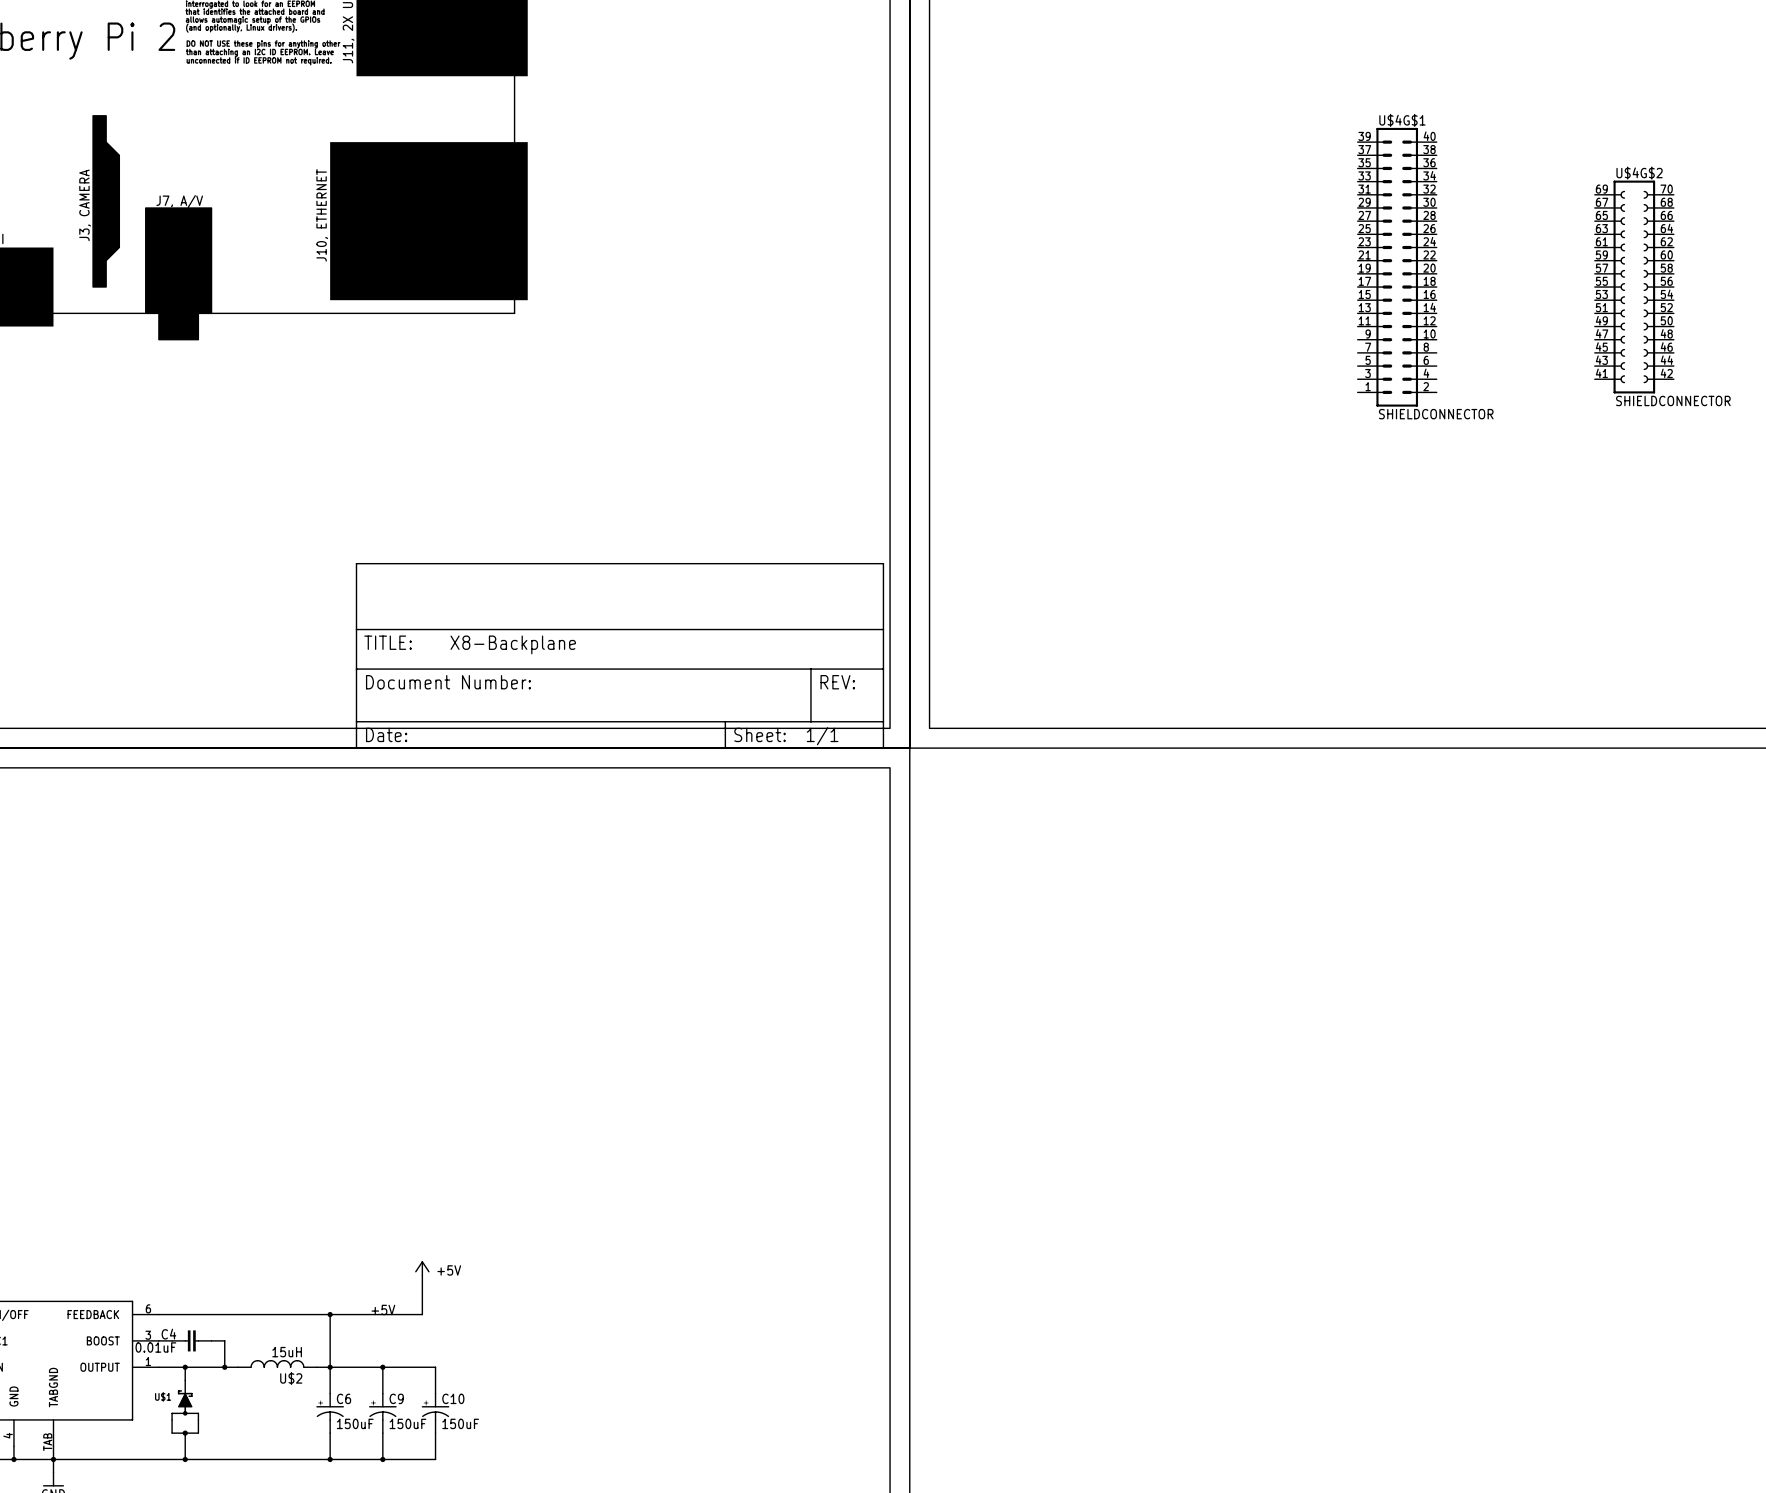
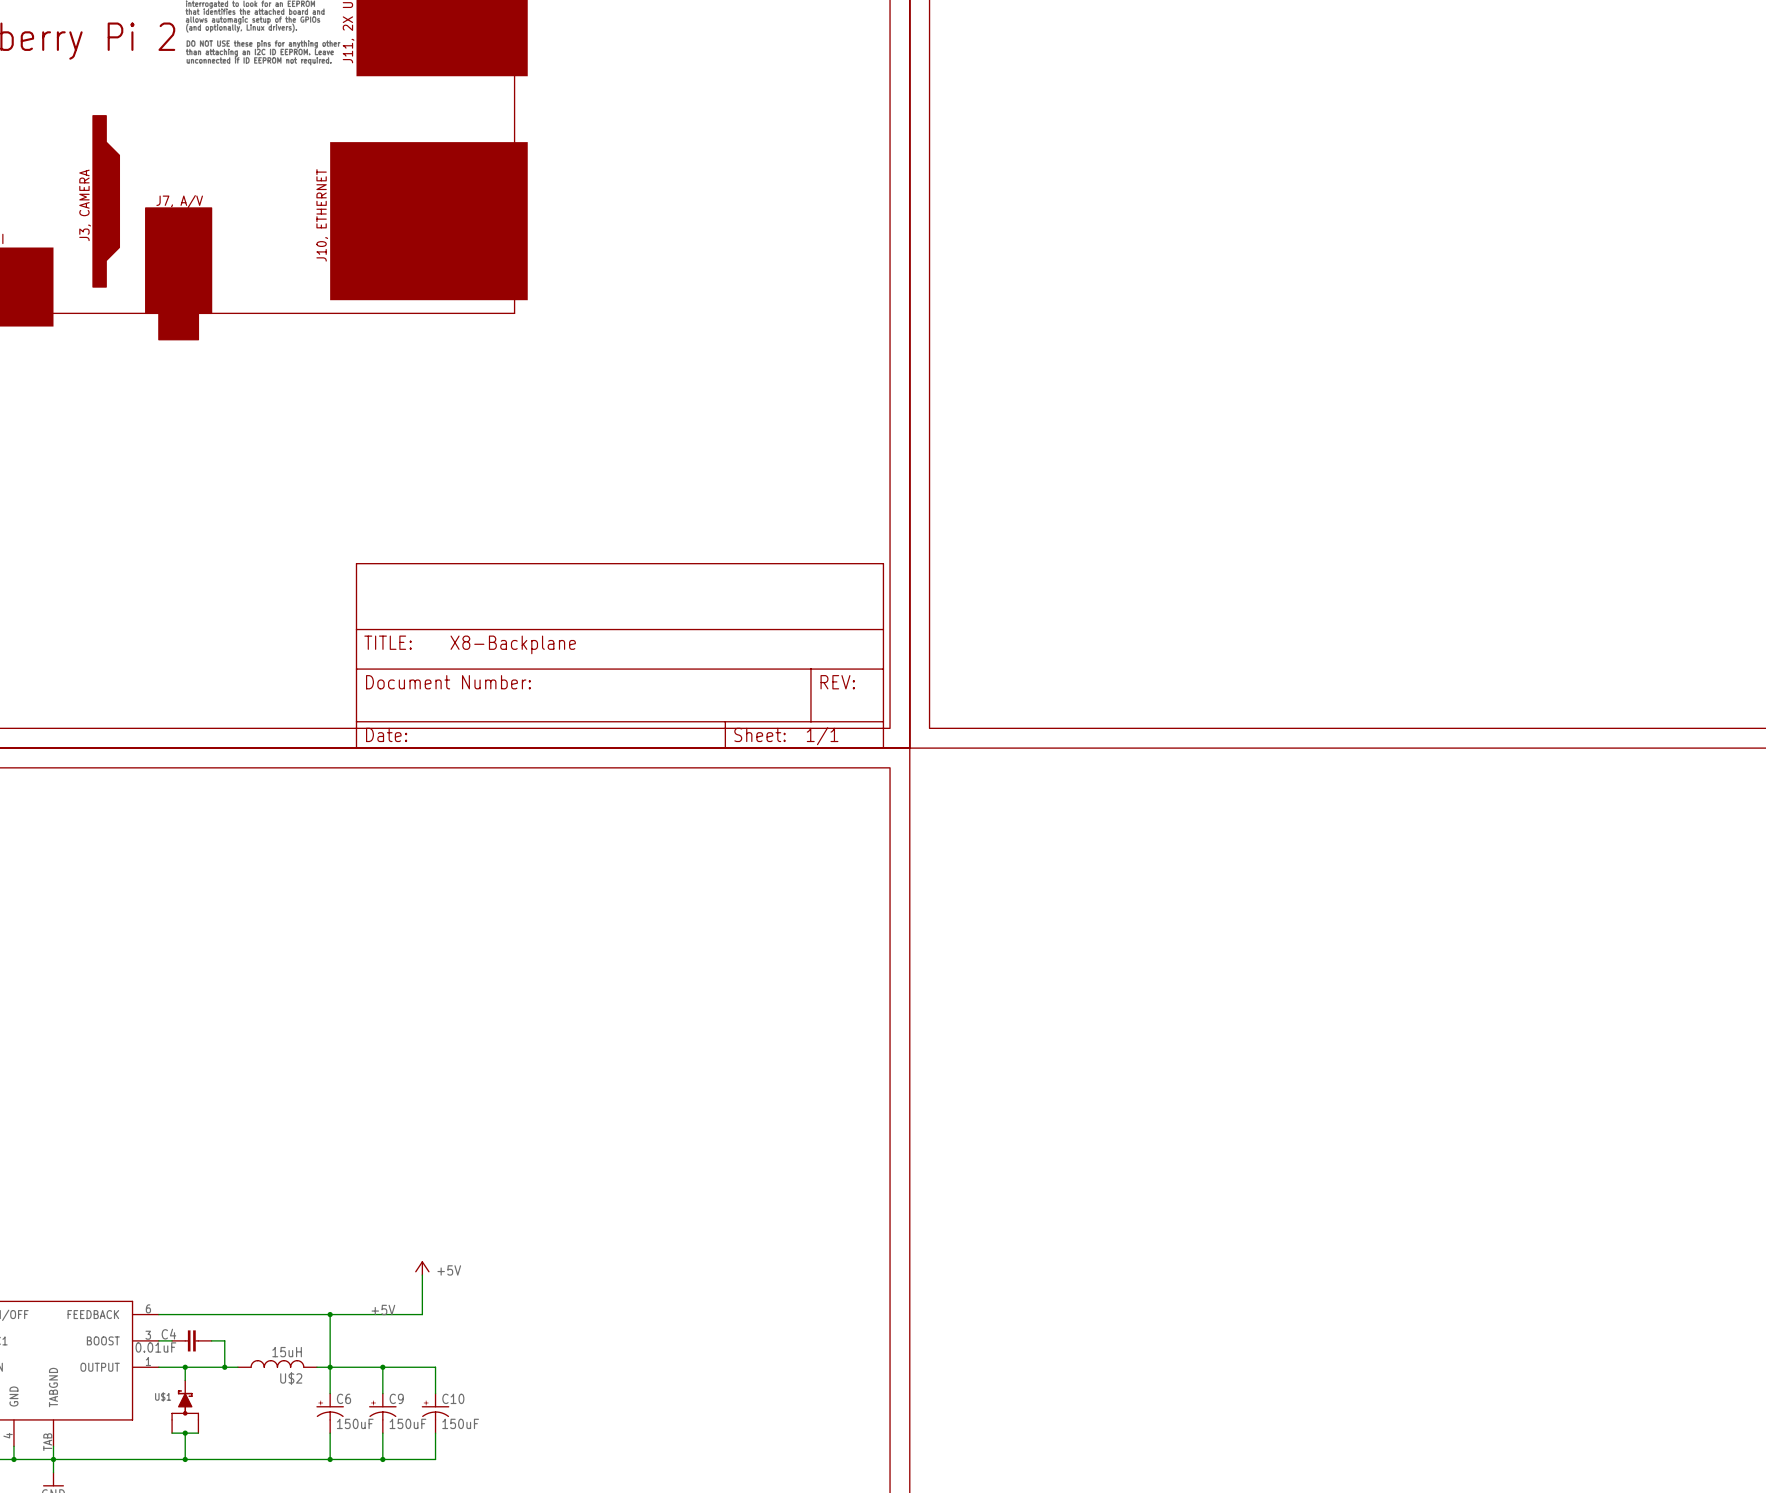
U$4G$1: SHIELDCONNECTOR (1397, 267) -> none
U$4G$2: SHIELDCONNECTOR (1634, 287) -> none

